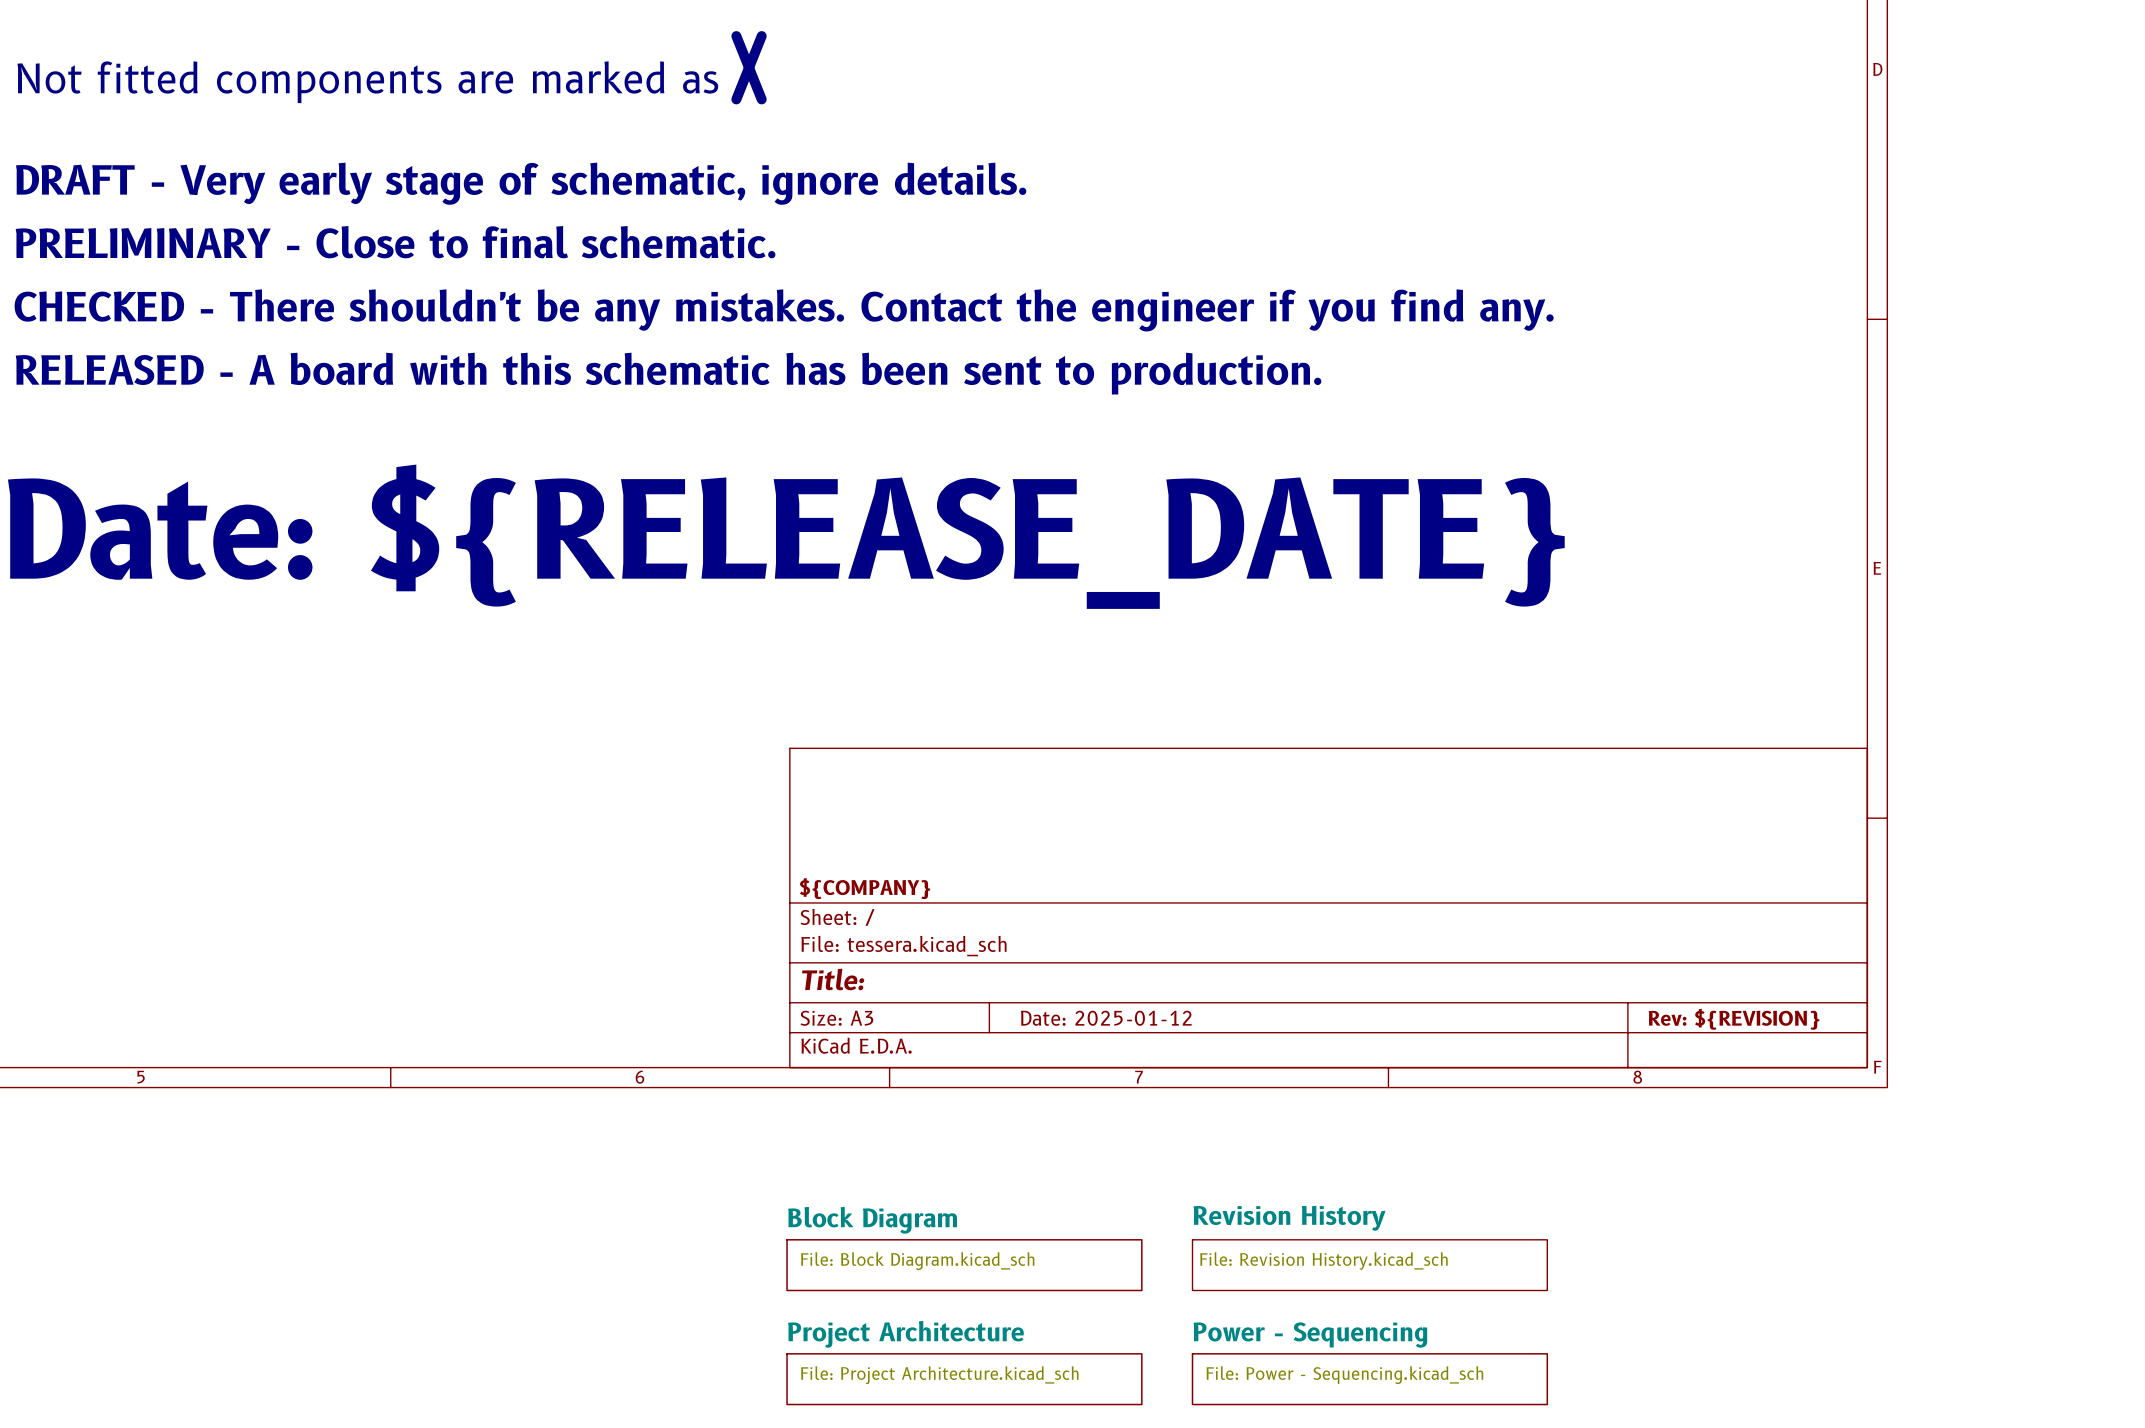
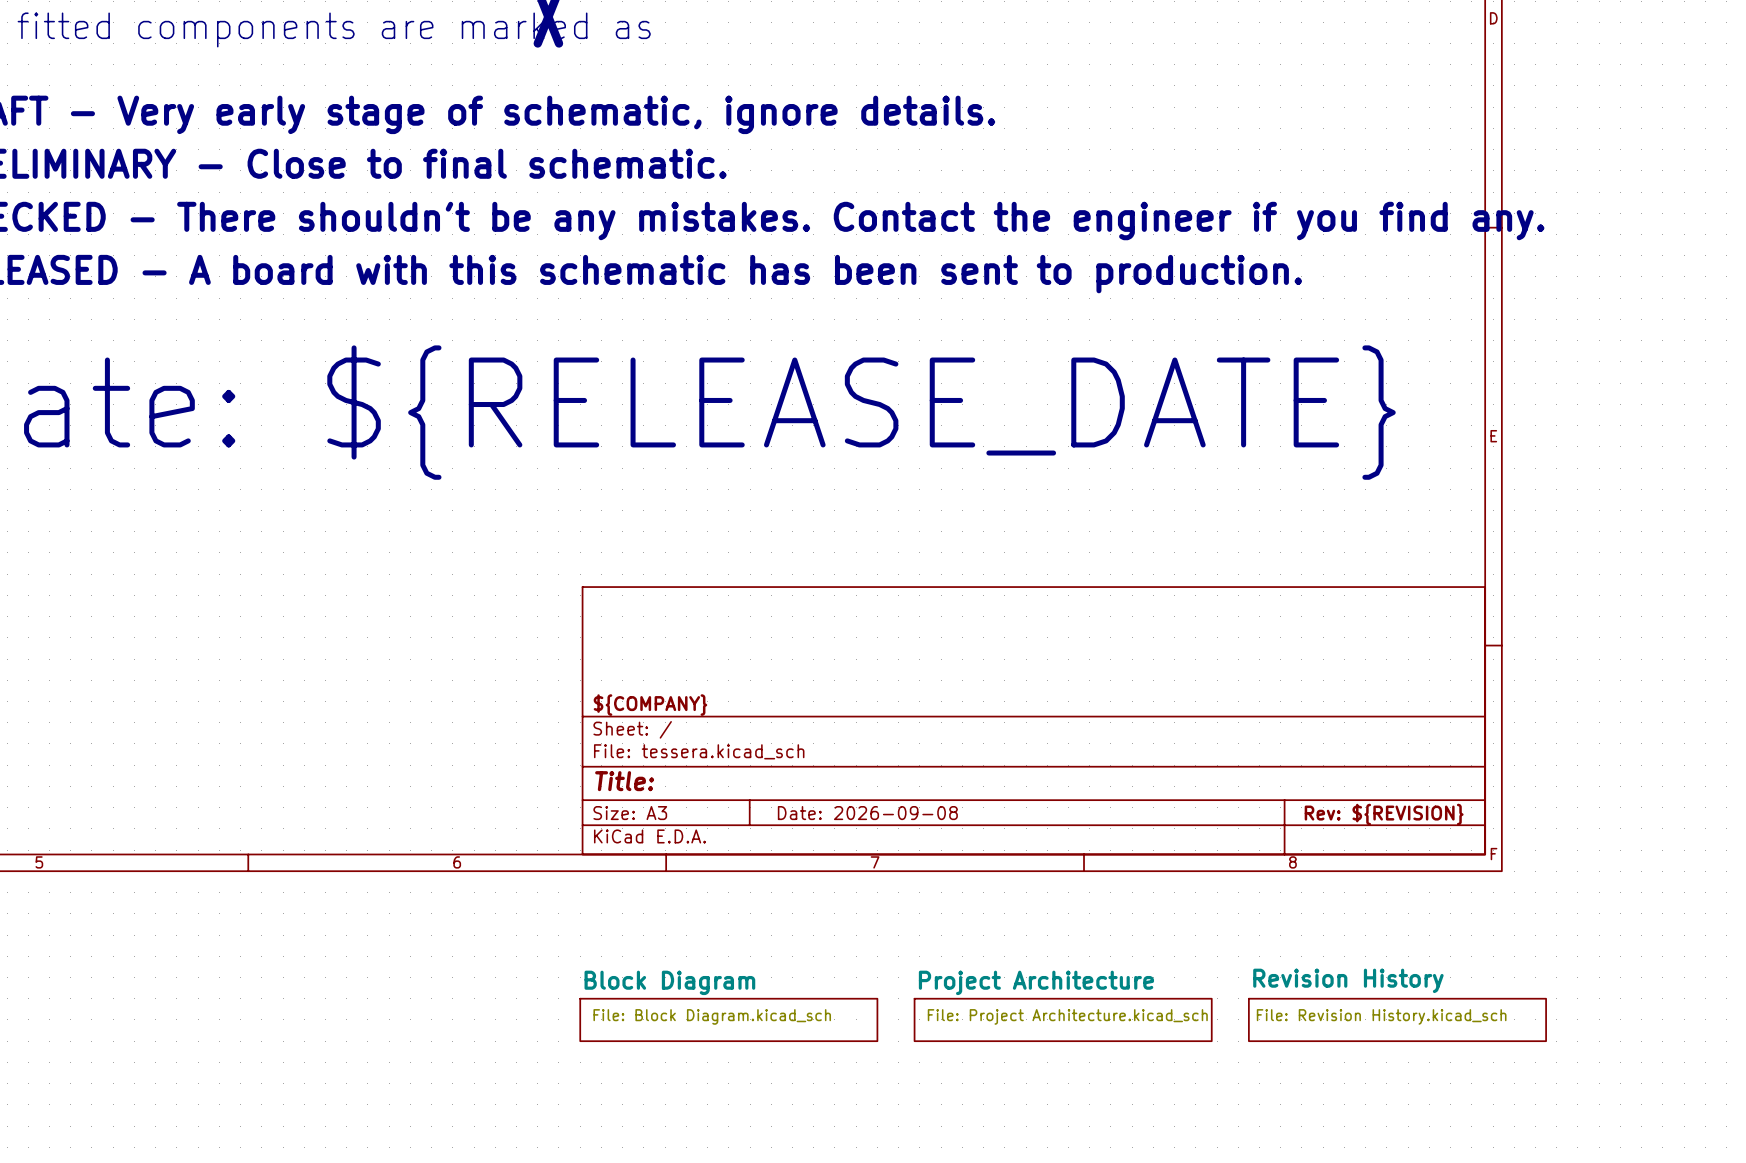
title block: Date: 2025-01-12 (1106, 1018) -> Date: 2026-09-08 (867, 813)
sheet Project Architecture: none -> File: Project Architecture.kicad_sch (1063, 1019)
sheet Revision History: File: Revision History.kicad_sch (1369, 1265) -> none
sheet Revision History: none -> File: Revision History.kicad_sch (1397, 1019)
sheet Project Architecture: File: Project Architecture.kicad_sch (964, 1379) -> none
sheet Power - Sequencing: File: Power - Sequencing.kicad_sch (1369, 1379) -> none

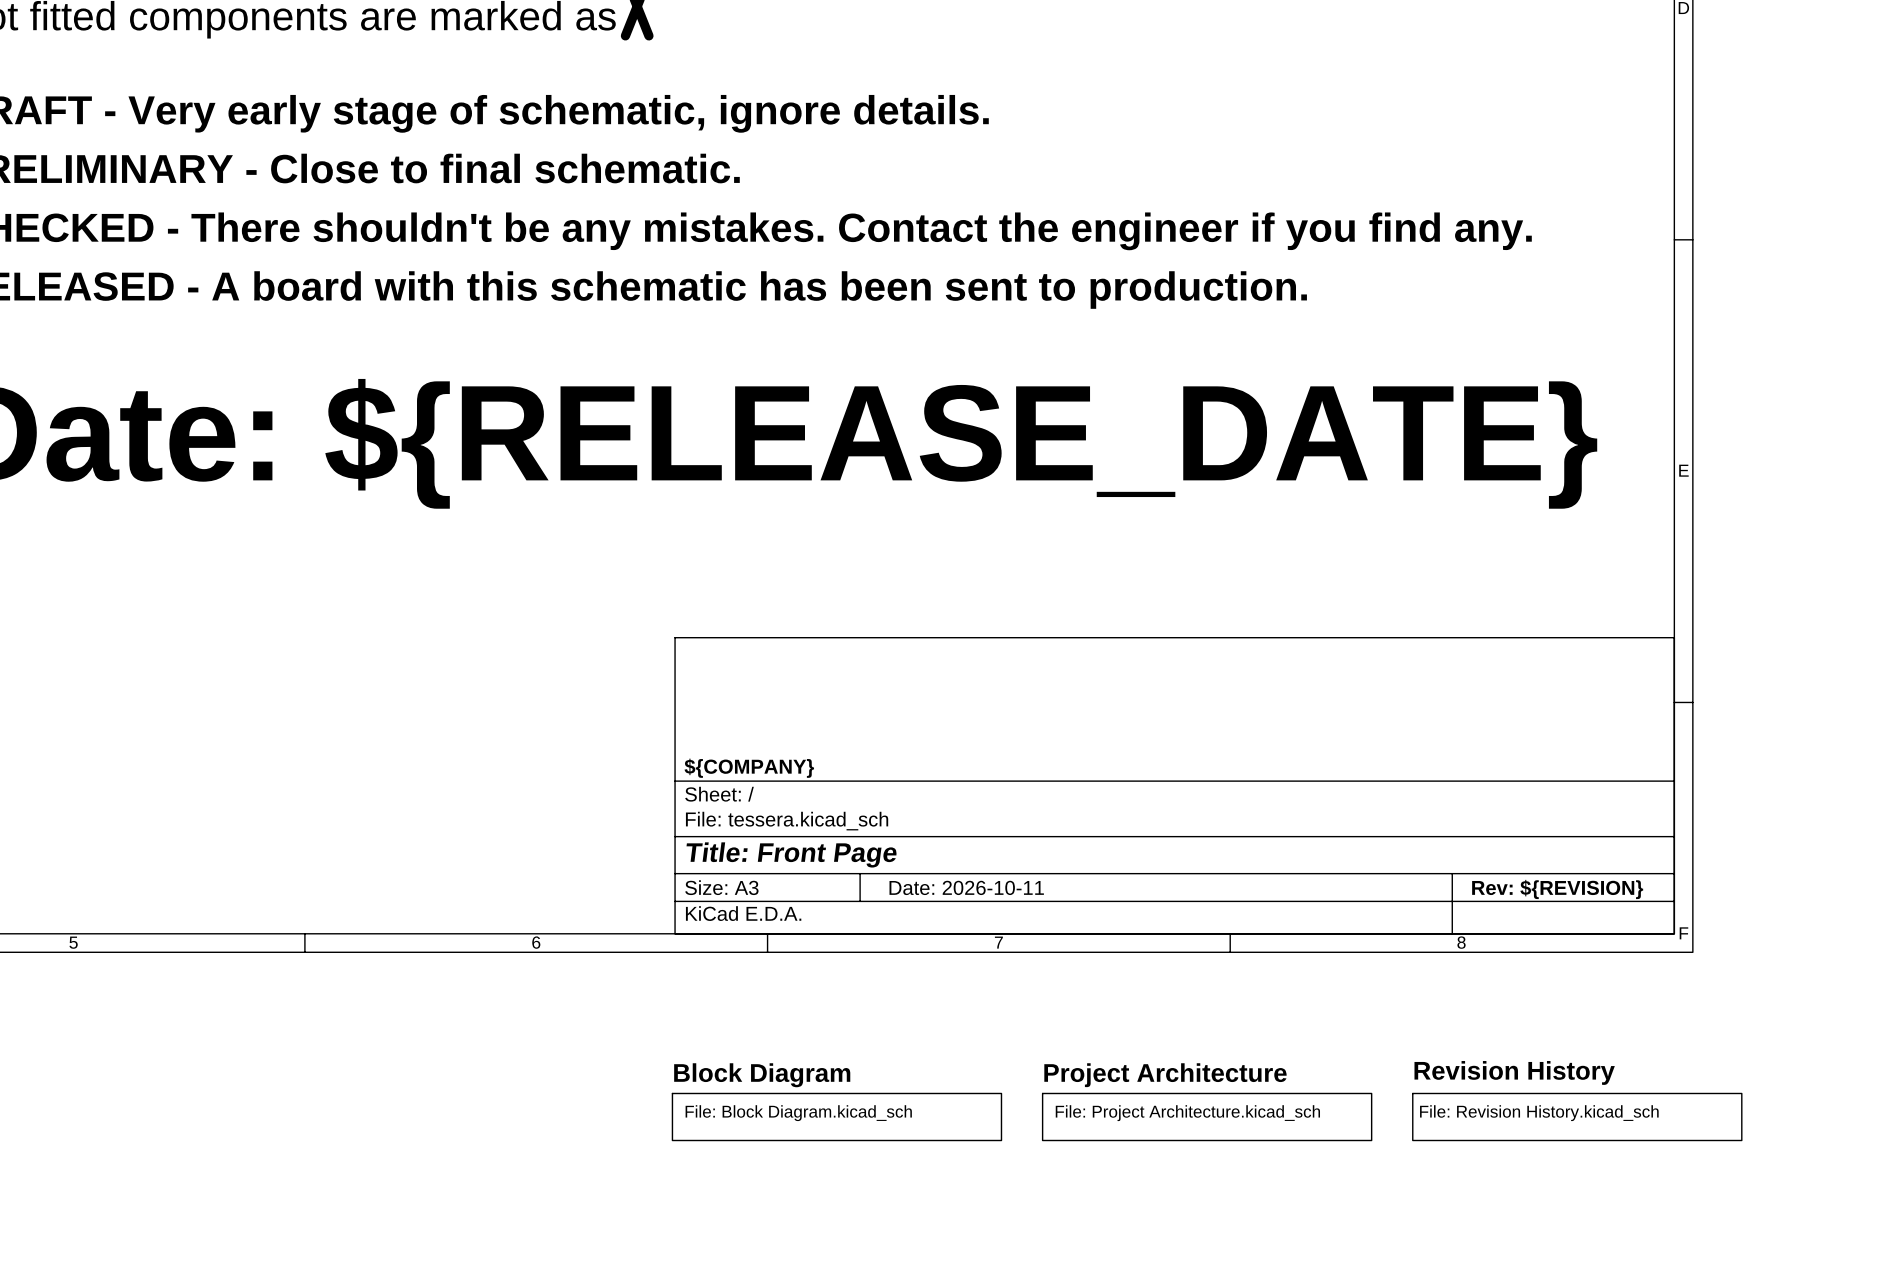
title block: Title: (624, 781) -> Title: Front Page (791, 854)
title block: Date: 2026-09-08 (867, 813) -> Date: 2026-10-11 (966, 887)

